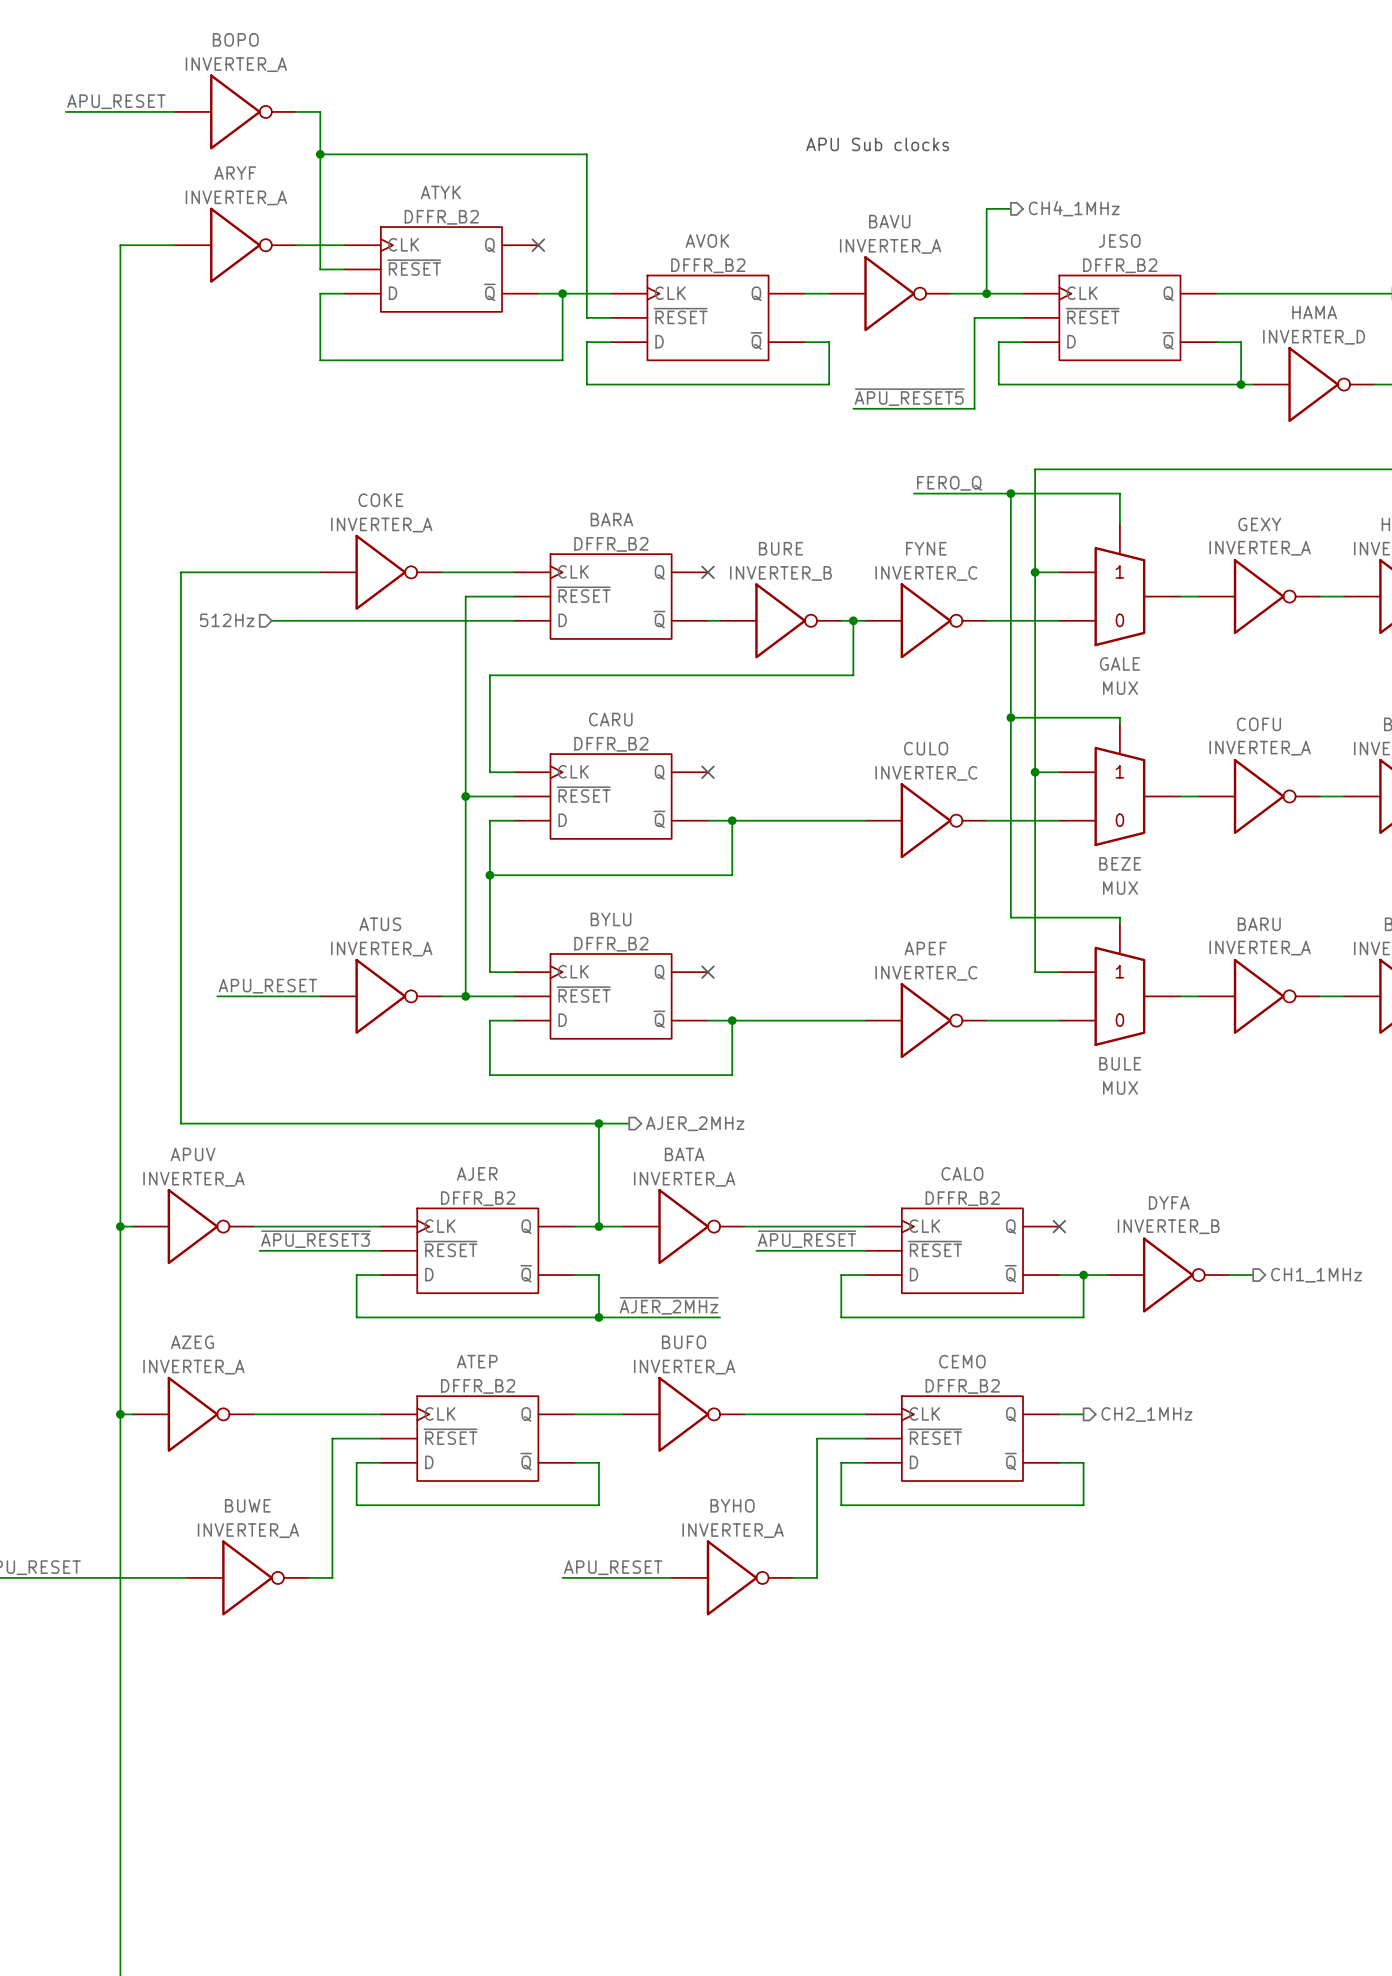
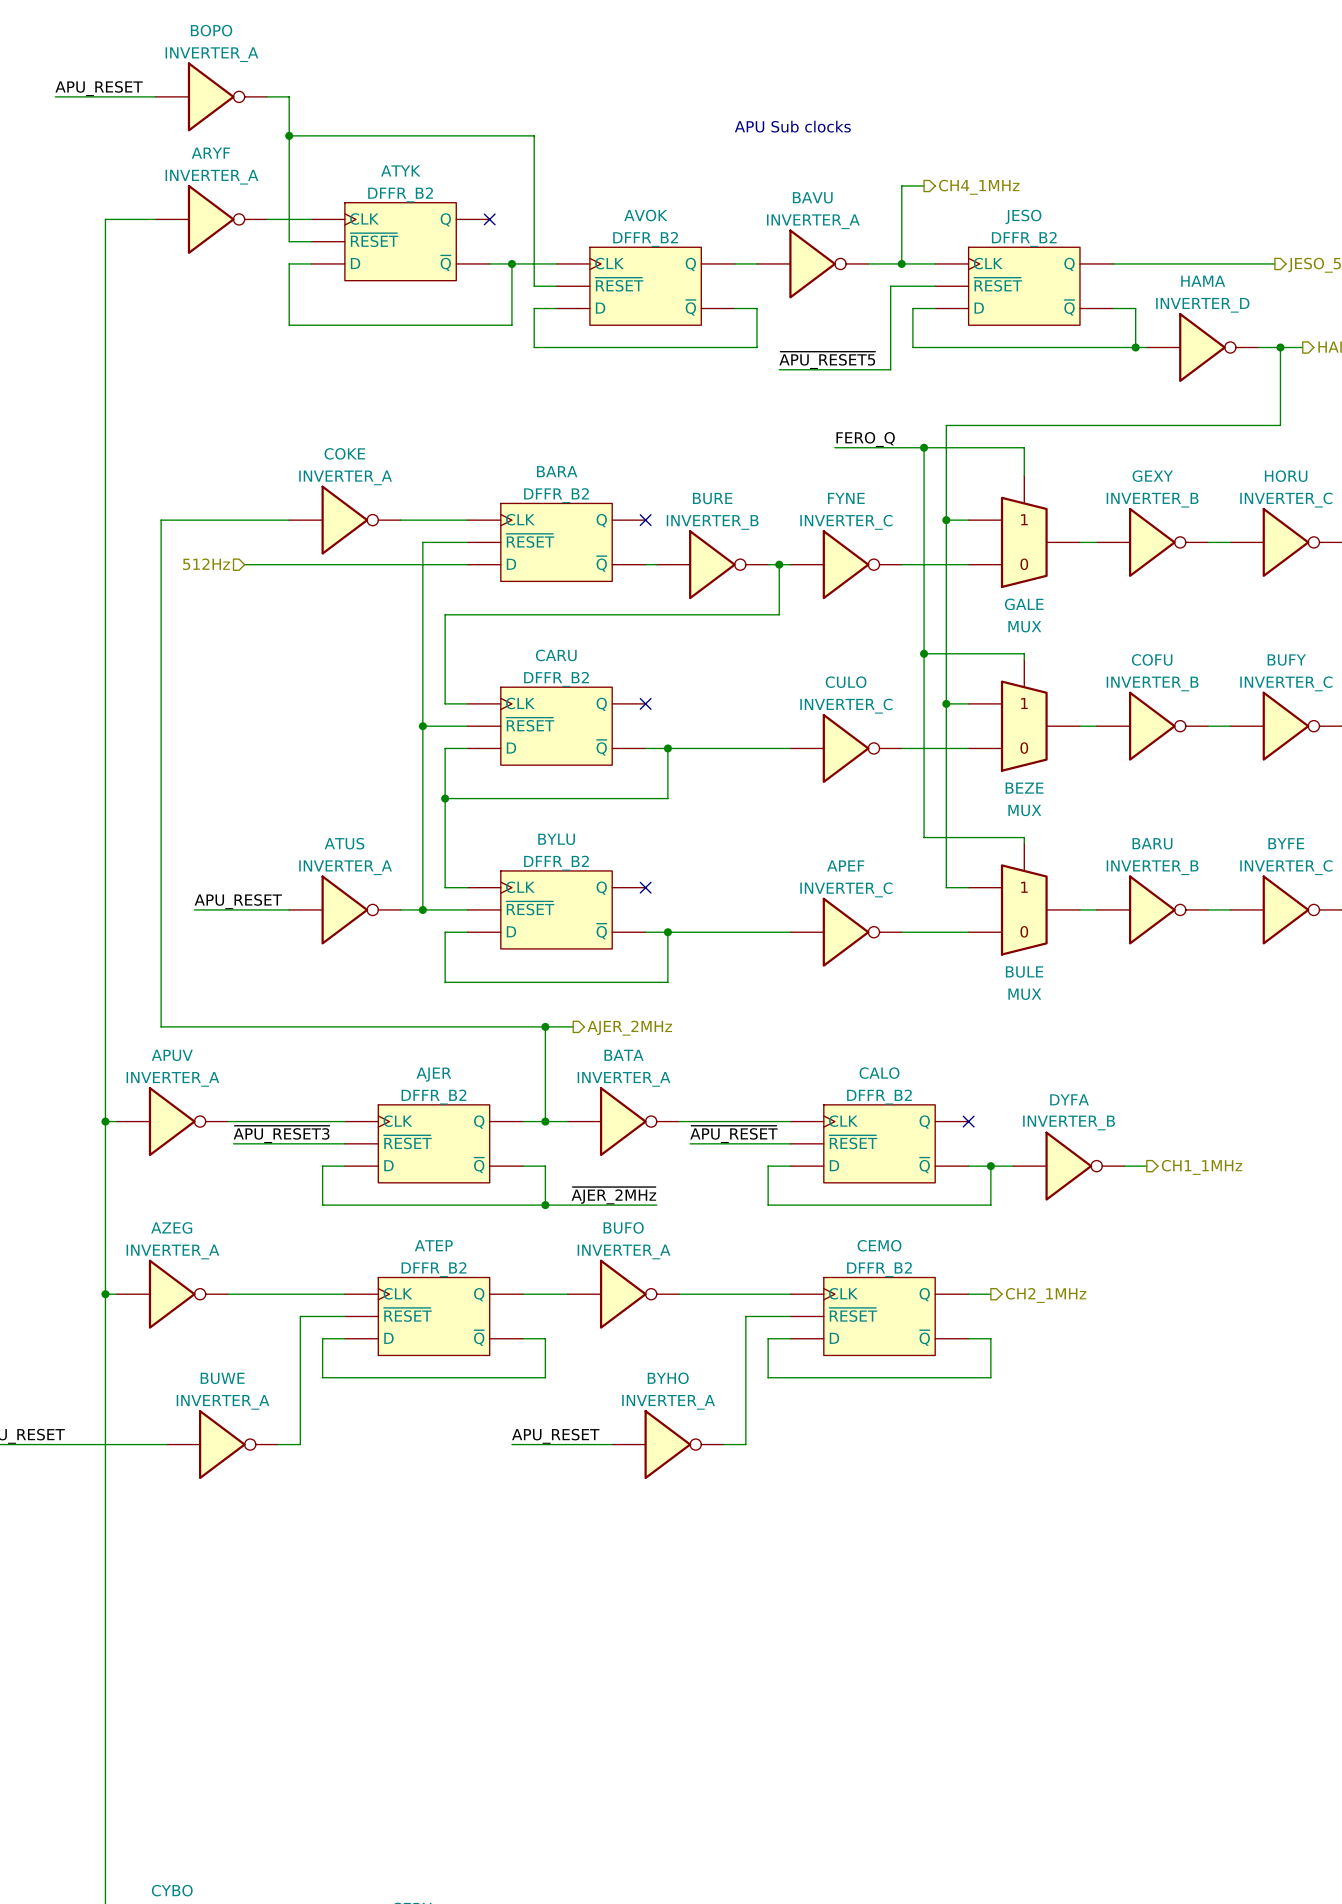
GEXY value: INVERTER_A (1260, 548) -> INVERTER_B (1152, 500)
COFU value: INVERTER_A (1260, 748) -> INVERTER_B (1152, 683)
BARU value: INVERTER_A (1260, 948) -> INVERTER_B (1152, 867)

